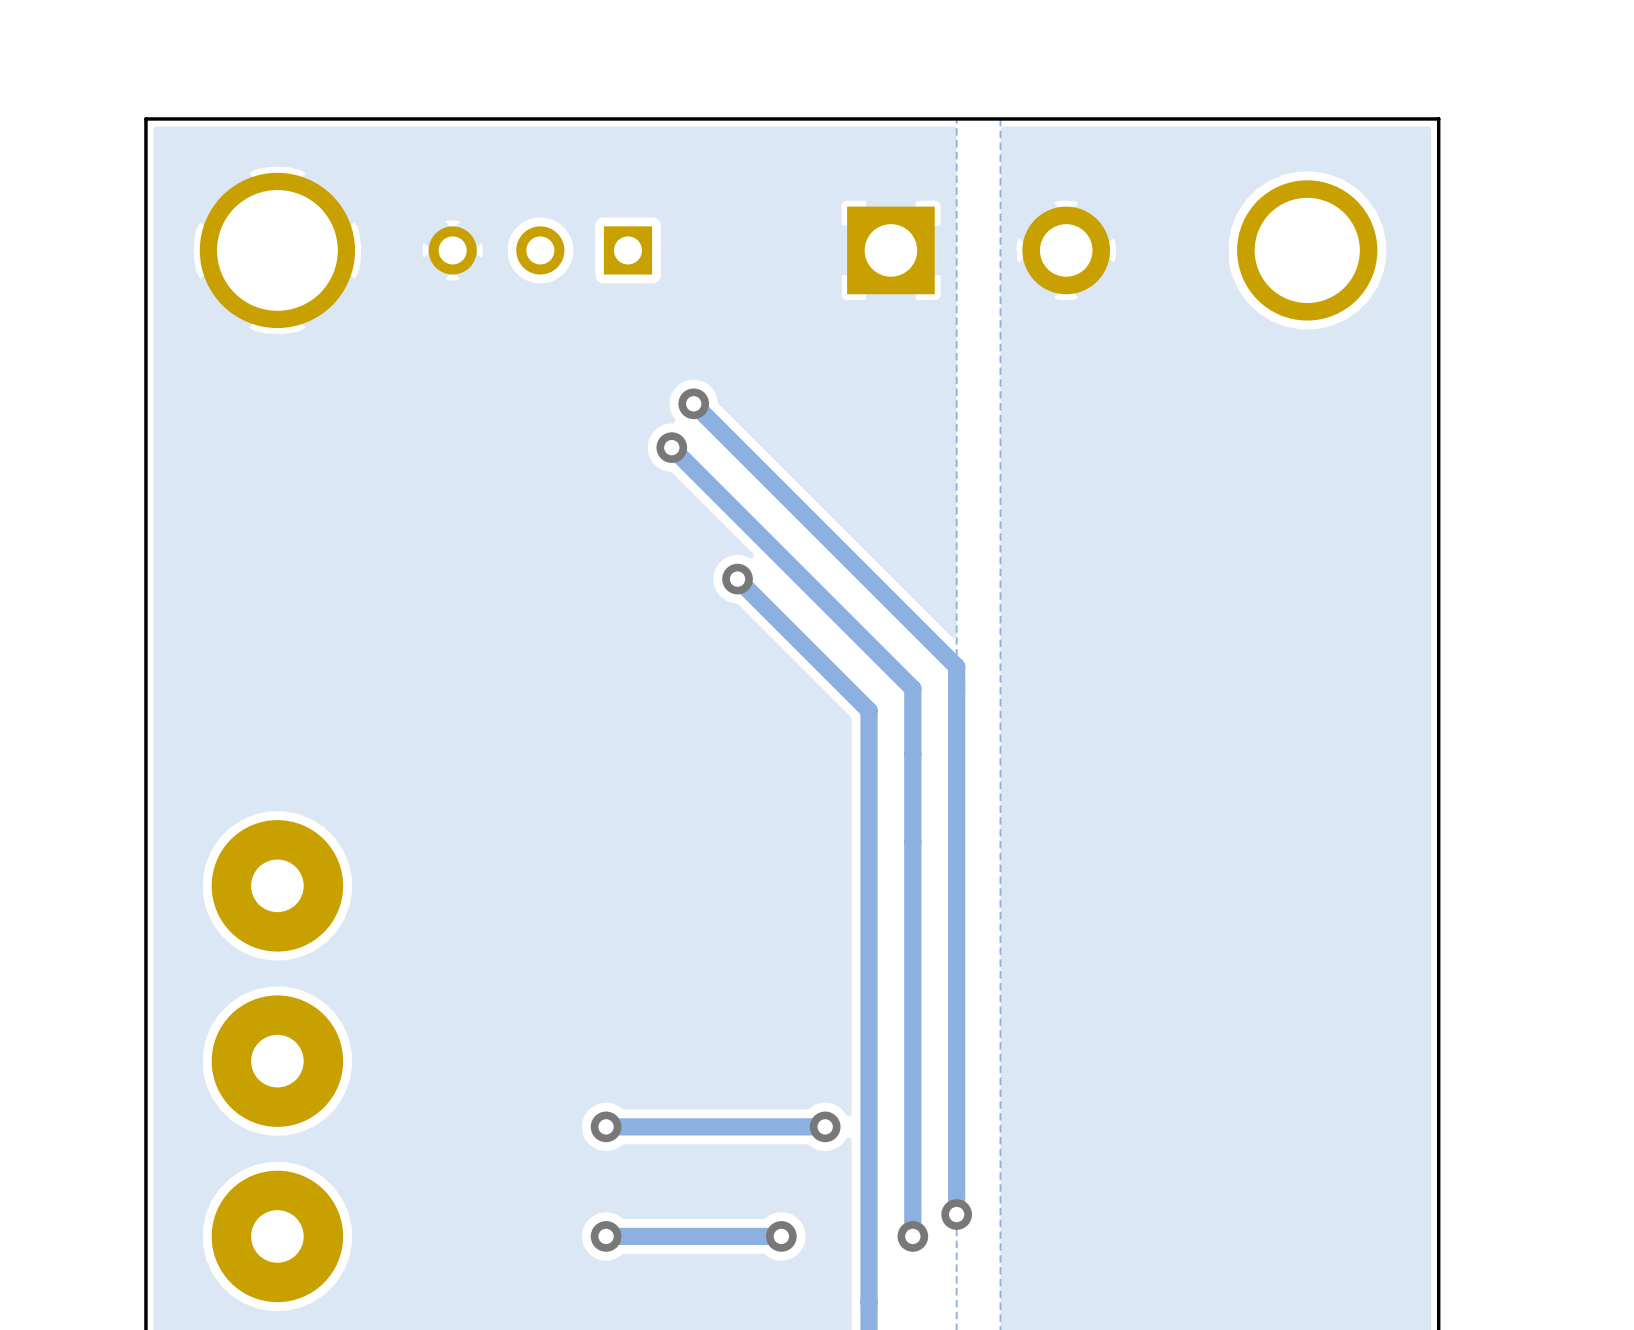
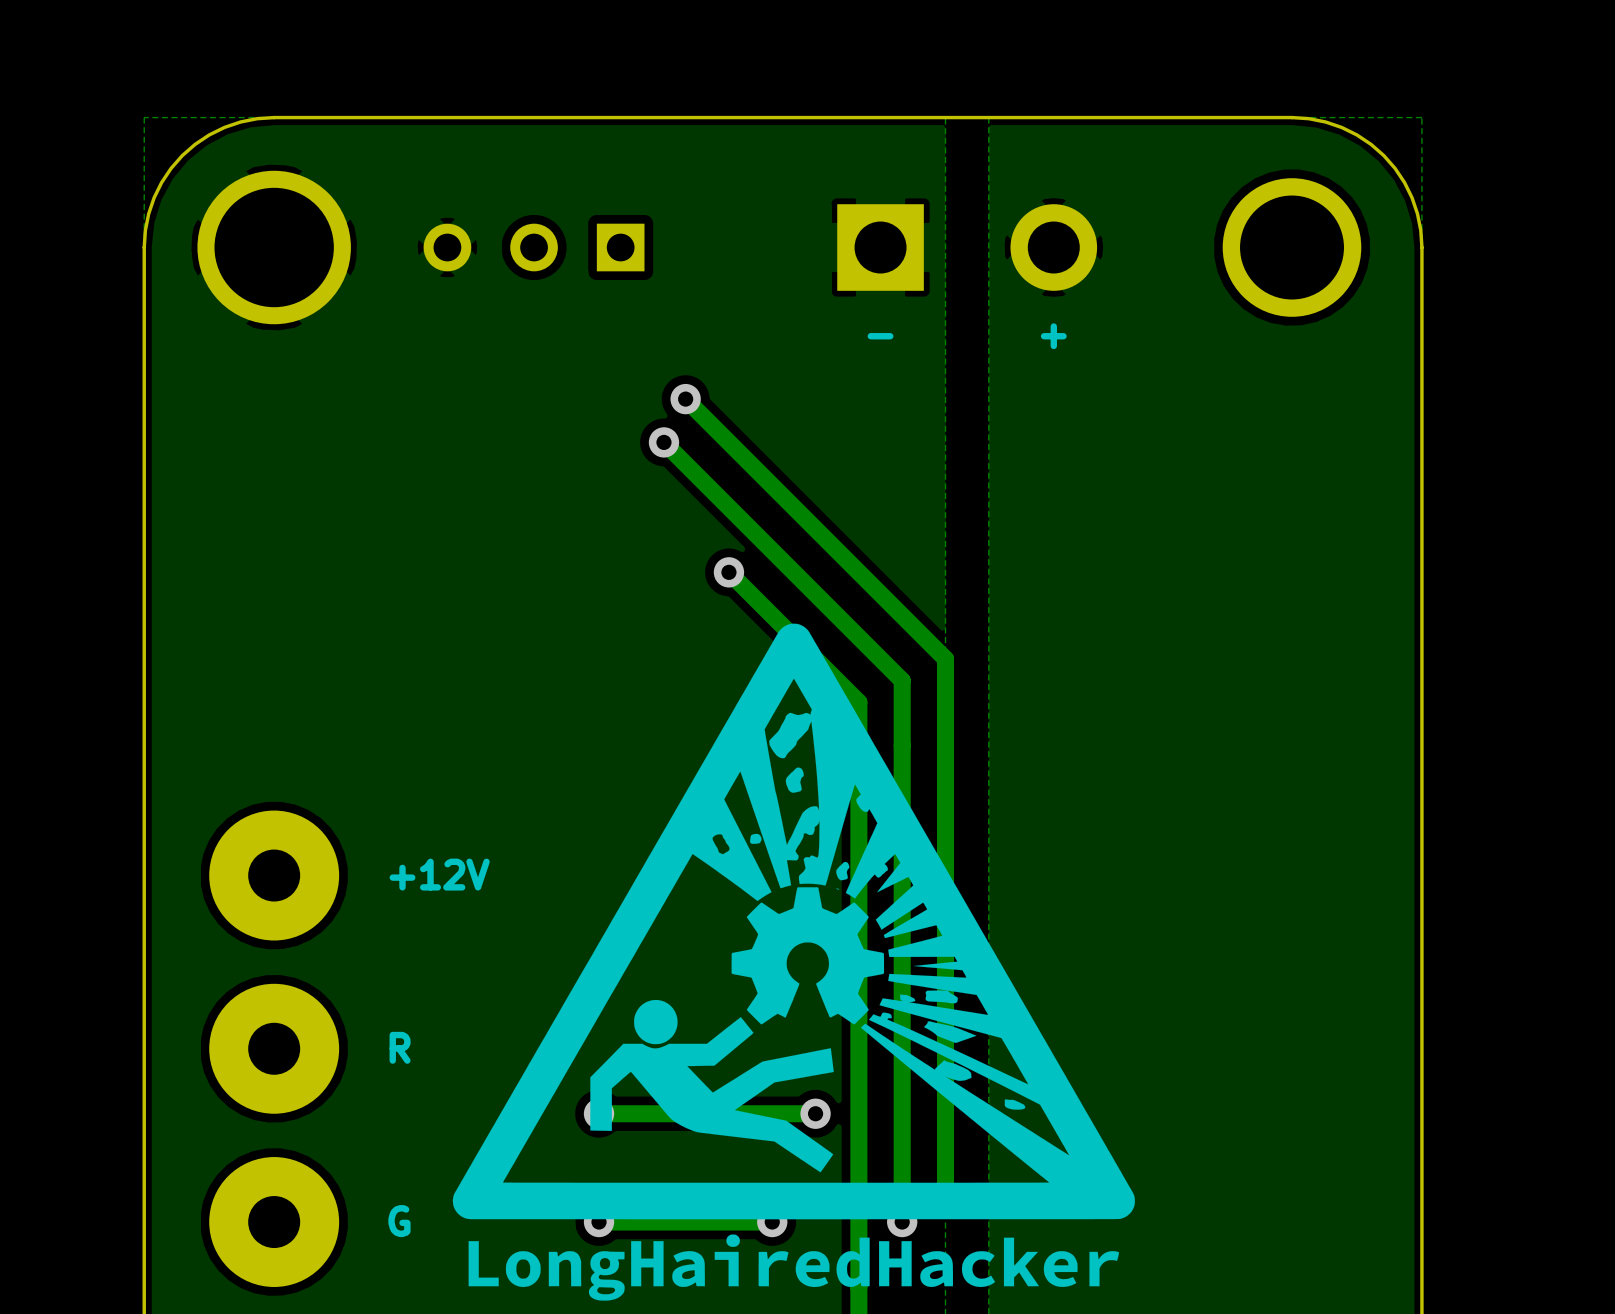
board edge: (277, 118) (145, 118) (145, 250) -> (274, 117) (257, 118) (224, 127) (209, 134) (182, 155) (161, 182) (154, 197) (145, 230) (144, 247)
board edge: (1307, 118) (1438, 118) (1438, 250) -> (1292, 117) (1308, 118) (1341, 127) (1356, 134) (1383, 155) (1404, 182) (1412, 197) (1420, 230) (1421, 247)
text: none -> - (880, 336)
text: none -> + (1053, 336)
drawing: none -> [452, 623, 1135, 1301]
text: none -> +12V (439, 874)
text: none -> R (400, 1047)
text: none -> G (399, 1221)

